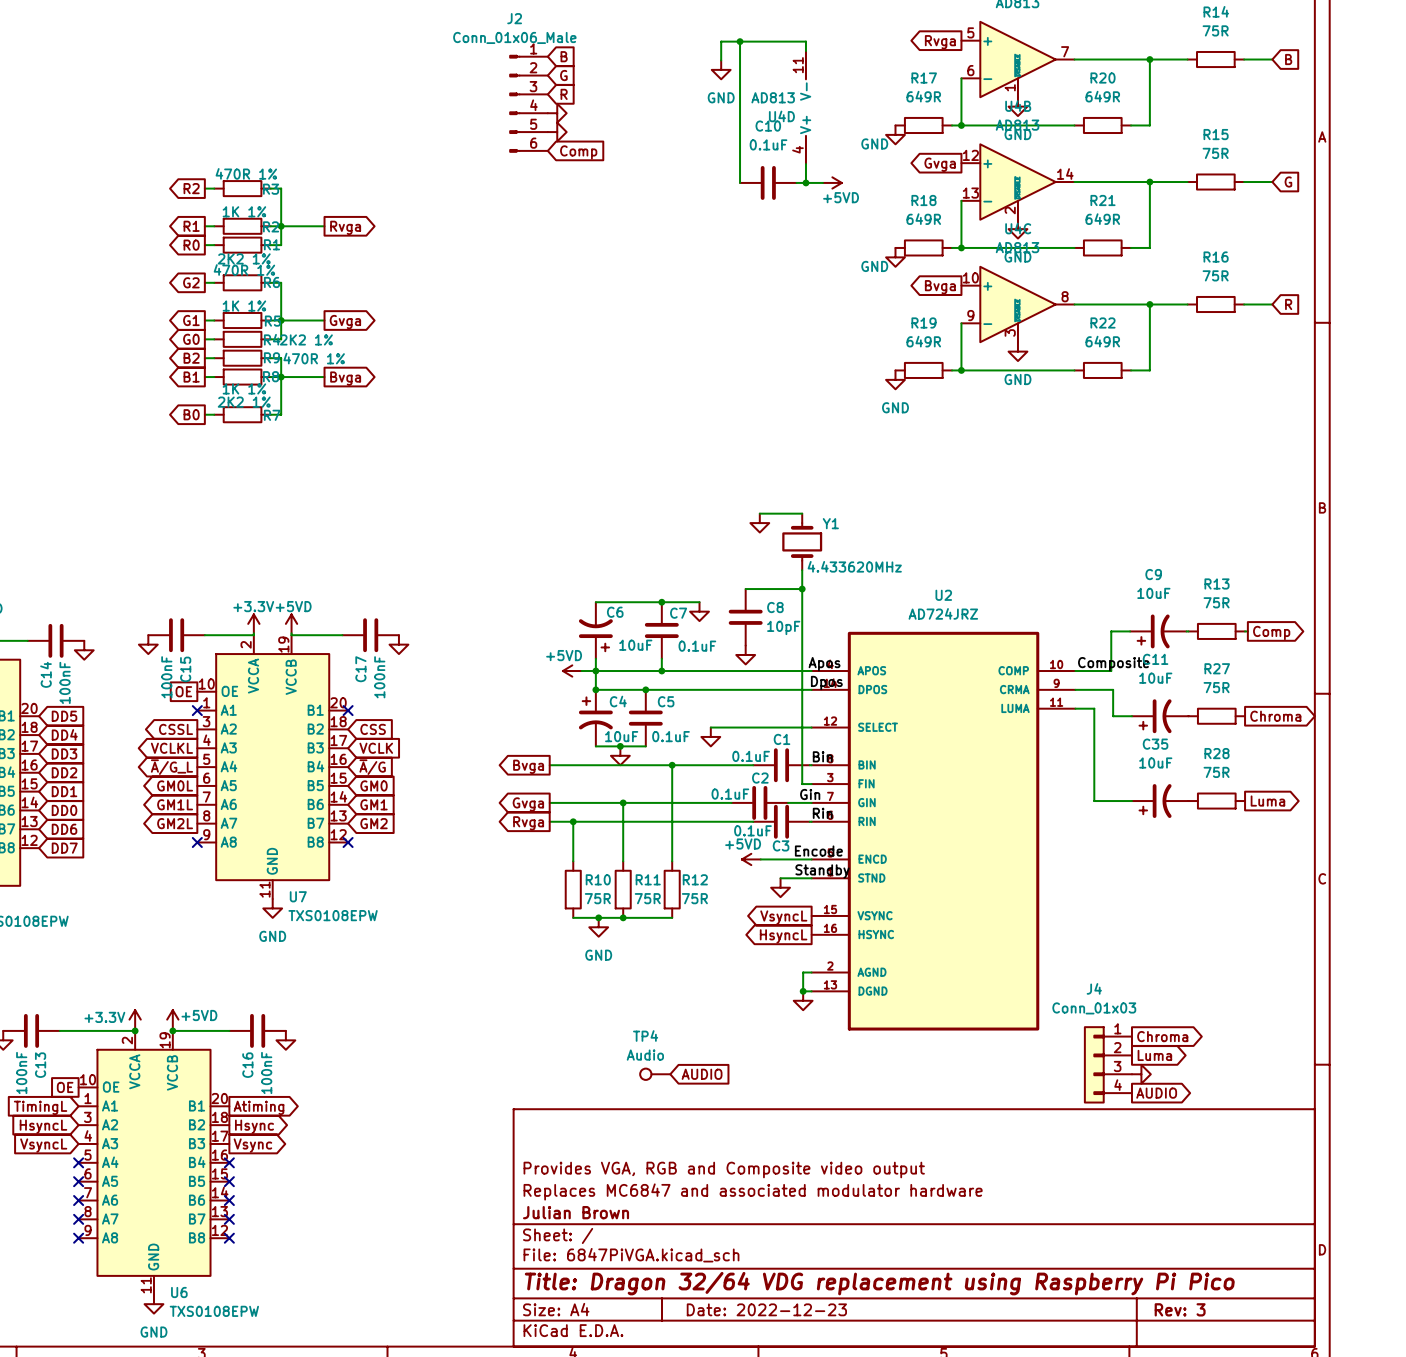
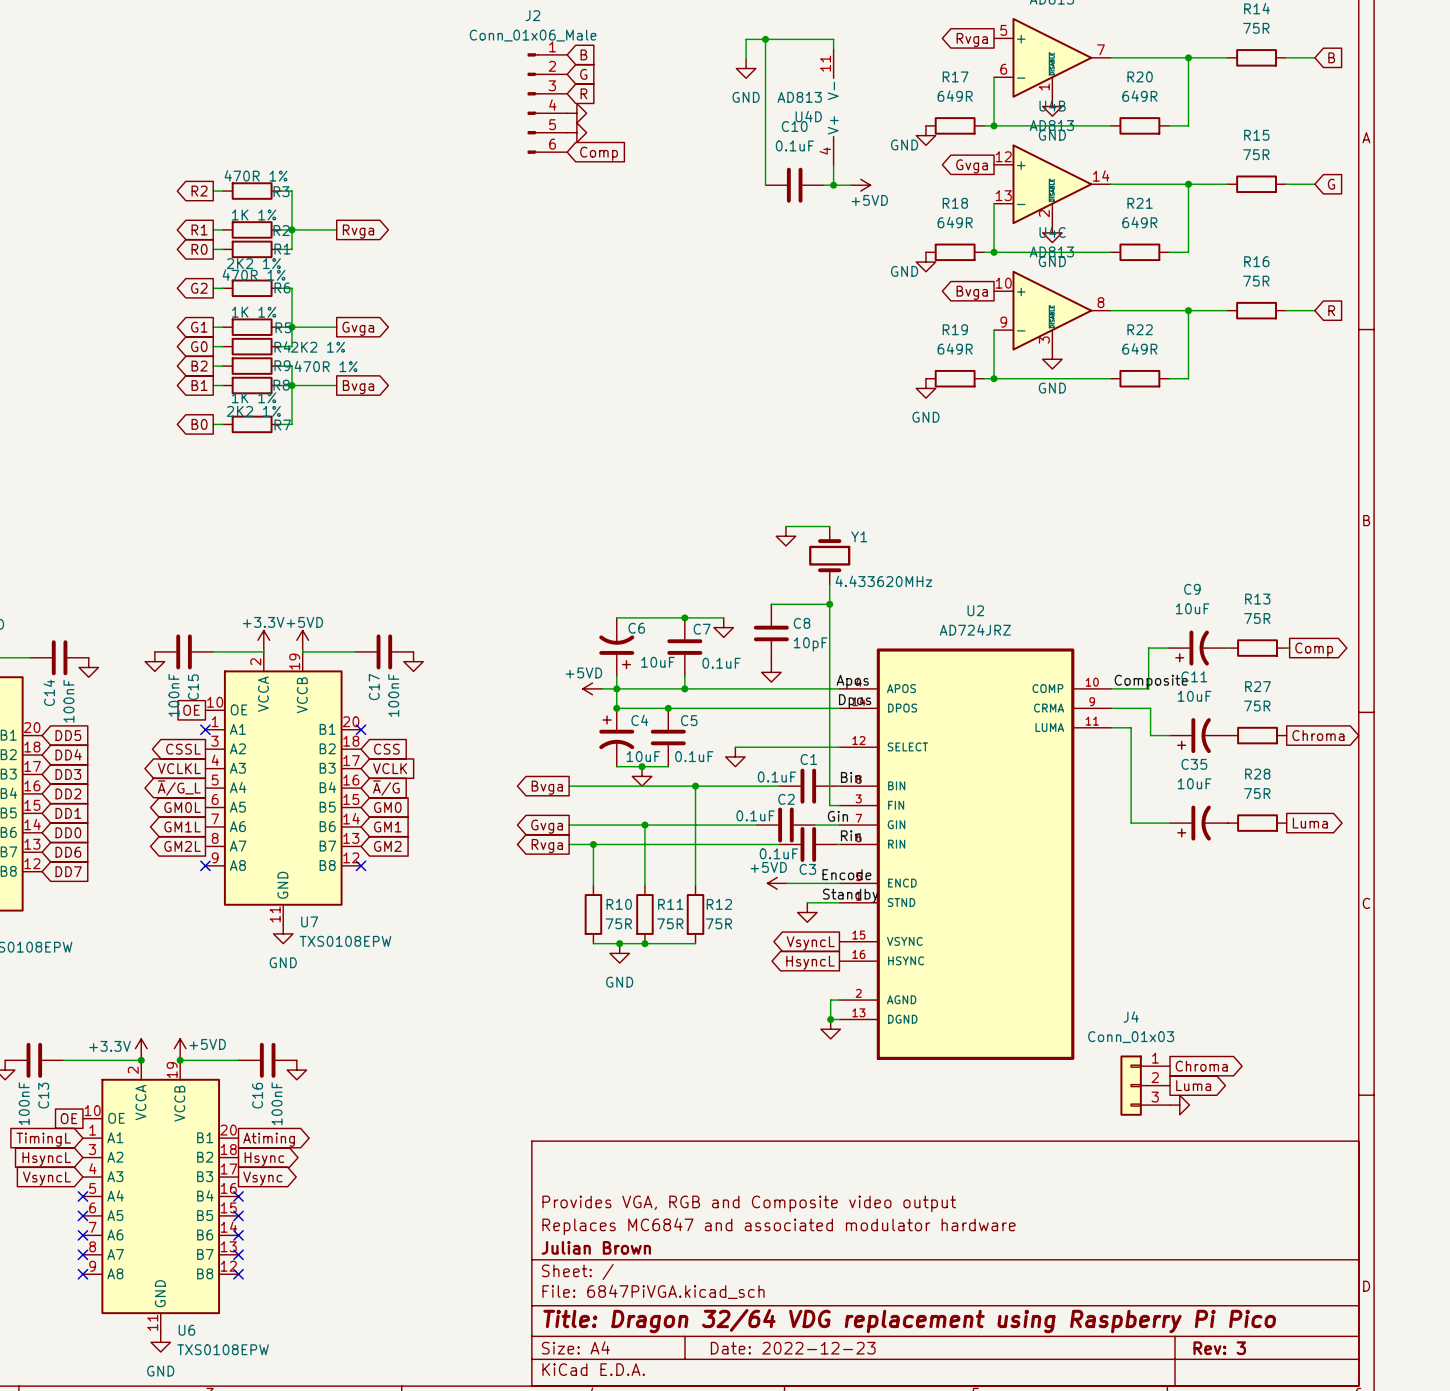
J4 symbol: [1083, 1026, 1132, 1104] -> [1120, 1055, 1171, 1116]
TP4: Audio (655, 1074) -> none
global label: AUDIO (702, 1074) -> none
global label: AUDIO (1156, 1093) -> none

